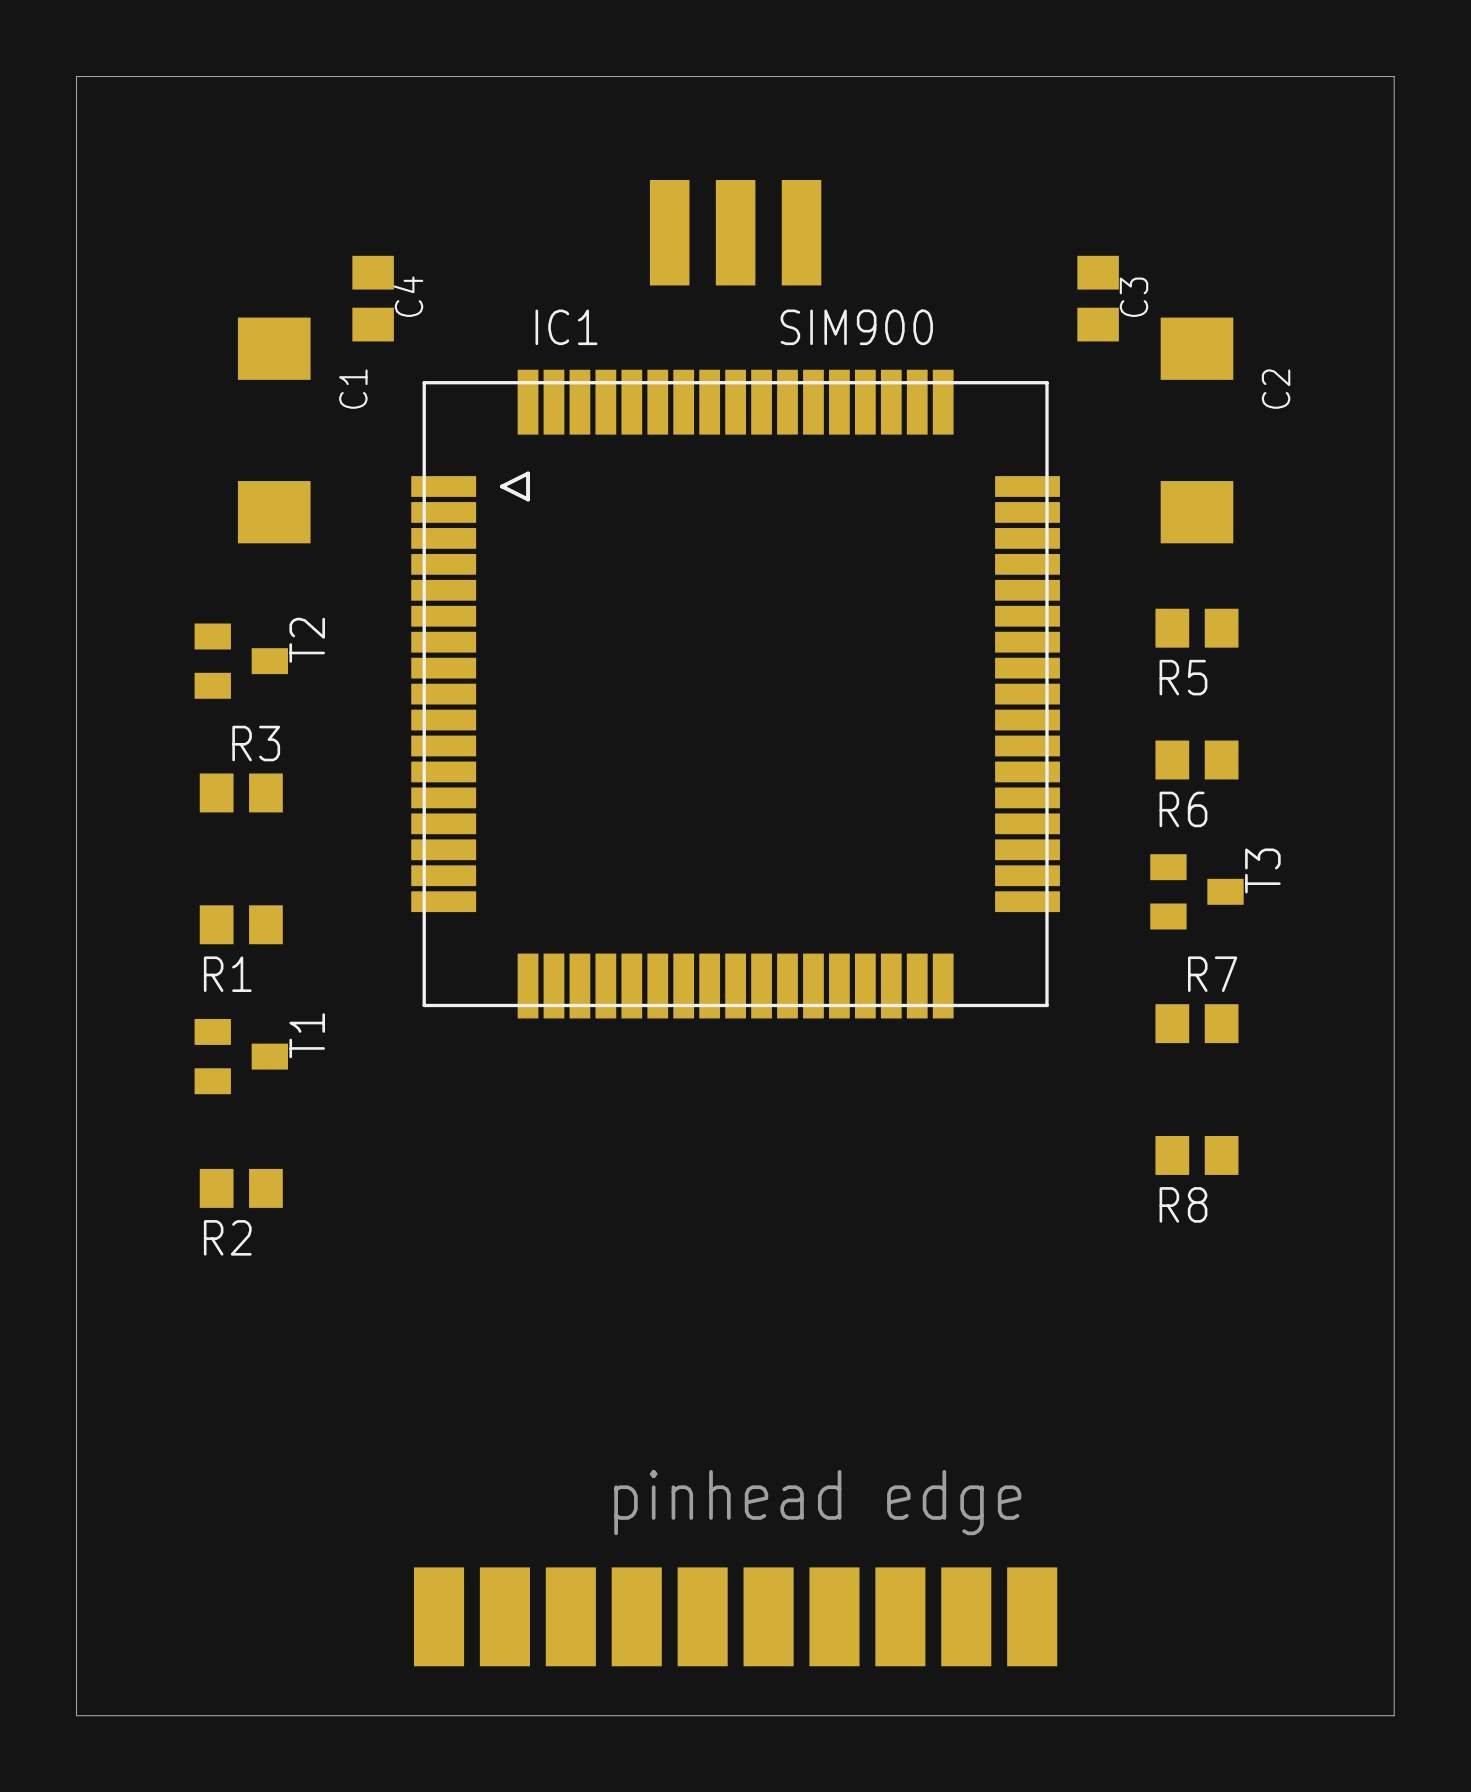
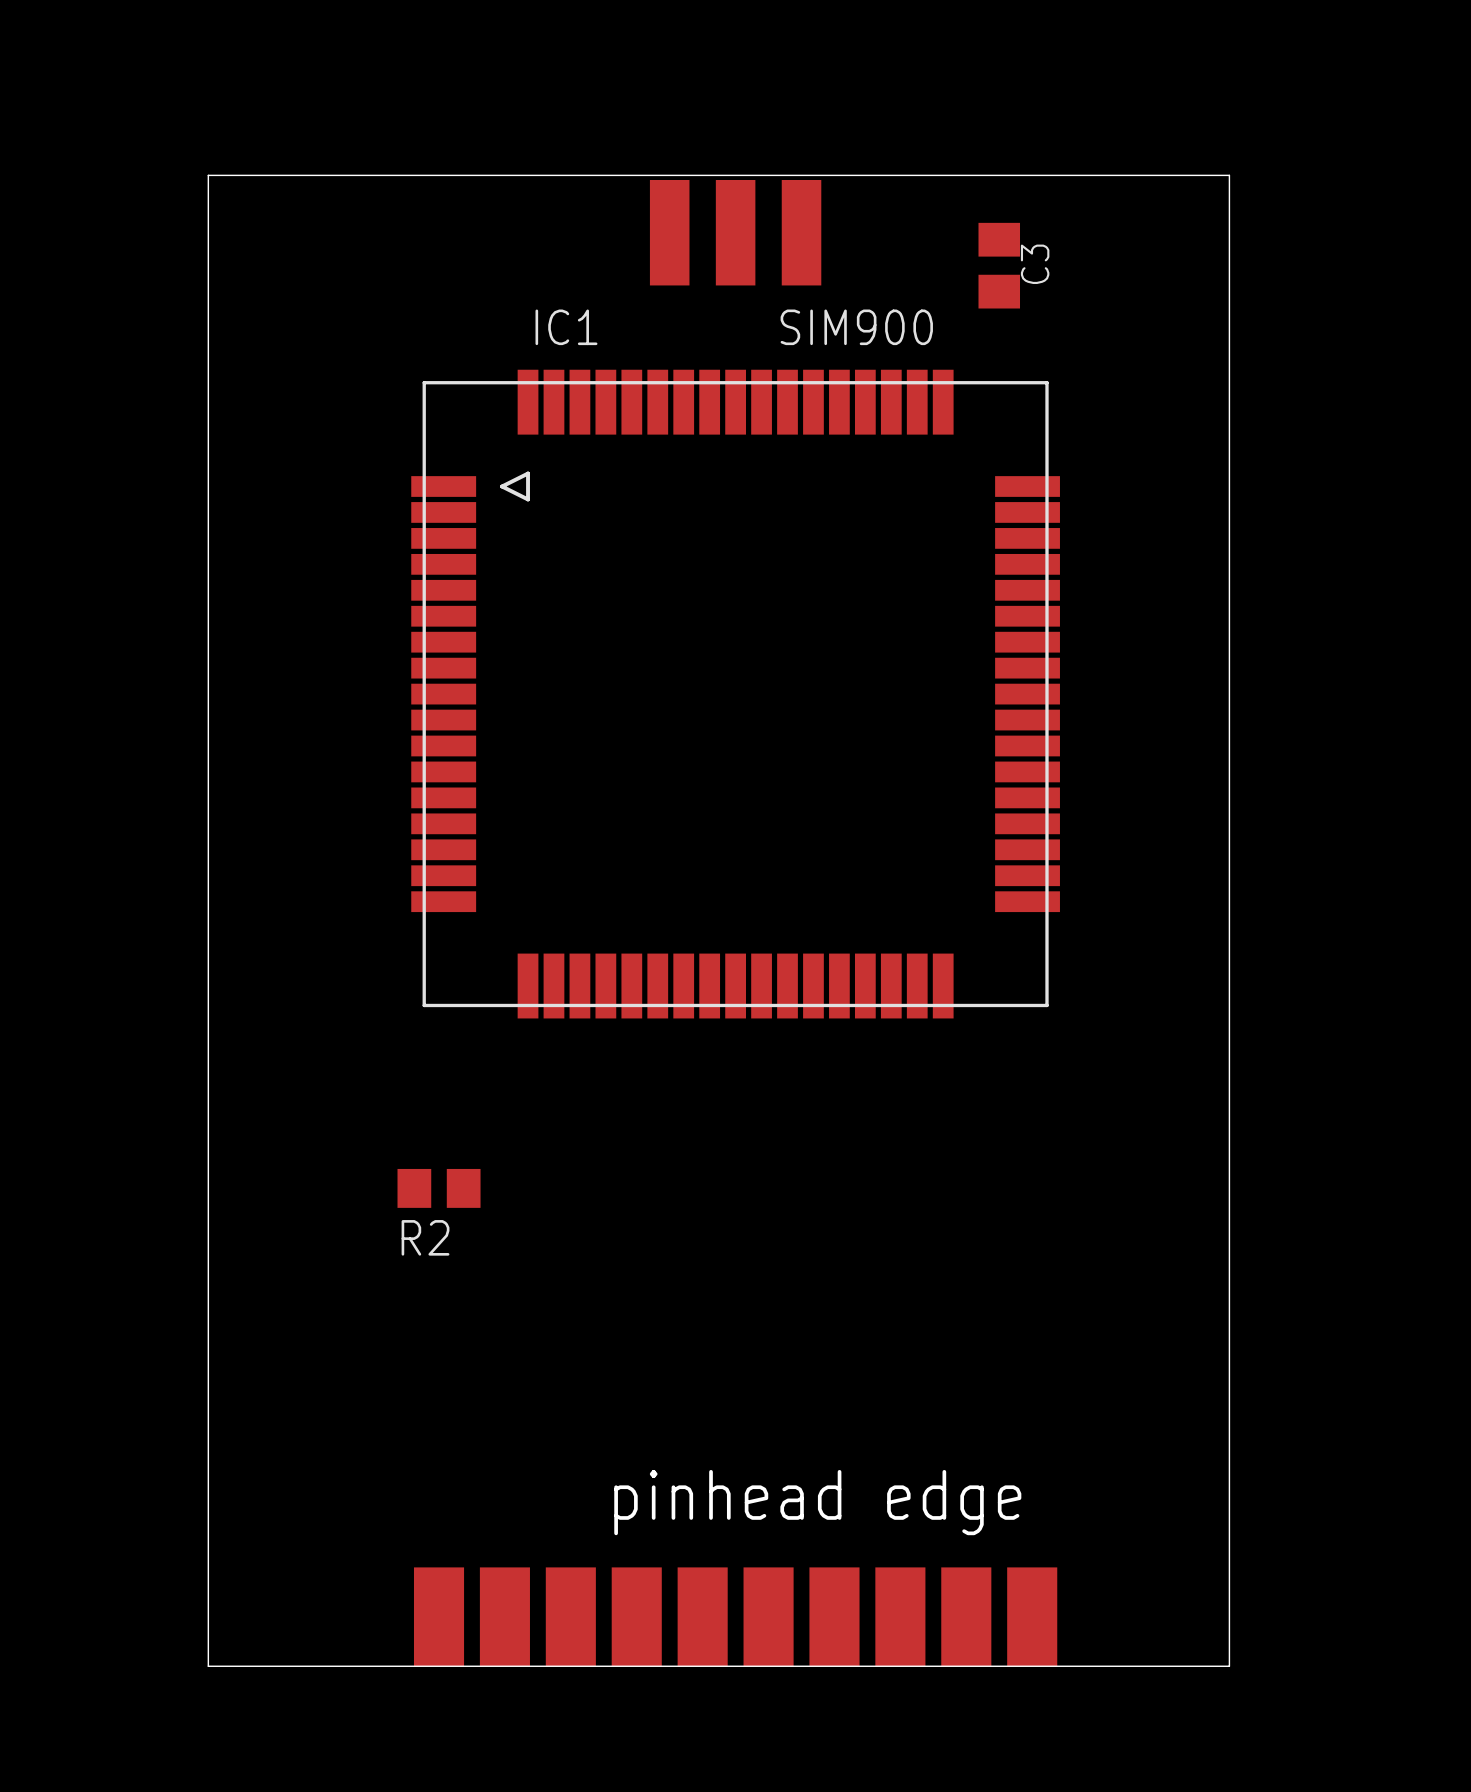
board edge: (76, 76) (1394, 76) (1394, 1715) (76, 1715) (76, 76) -> (208, 175) (208, 1666) (1229, 1666) (1229, 175) (208, 175)
C4: (373, 298) -> none
C3 position: (1098, 298) -> (999, 265)
C1: (274, 430) -> none
C2: (1196, 430) -> none
R5: (1196, 628) -> none
T2: (241, 661) -> none
R6: (1196, 760) -> none
R3: (241, 792) -> none
T3: (1196, 891) -> none
R1: (241, 924) -> none
R7: (1196, 1023) -> none
T1: (241, 1056) -> none
R8: (1196, 1155) -> none
R2 position: (241, 1188) -> (439, 1188)

